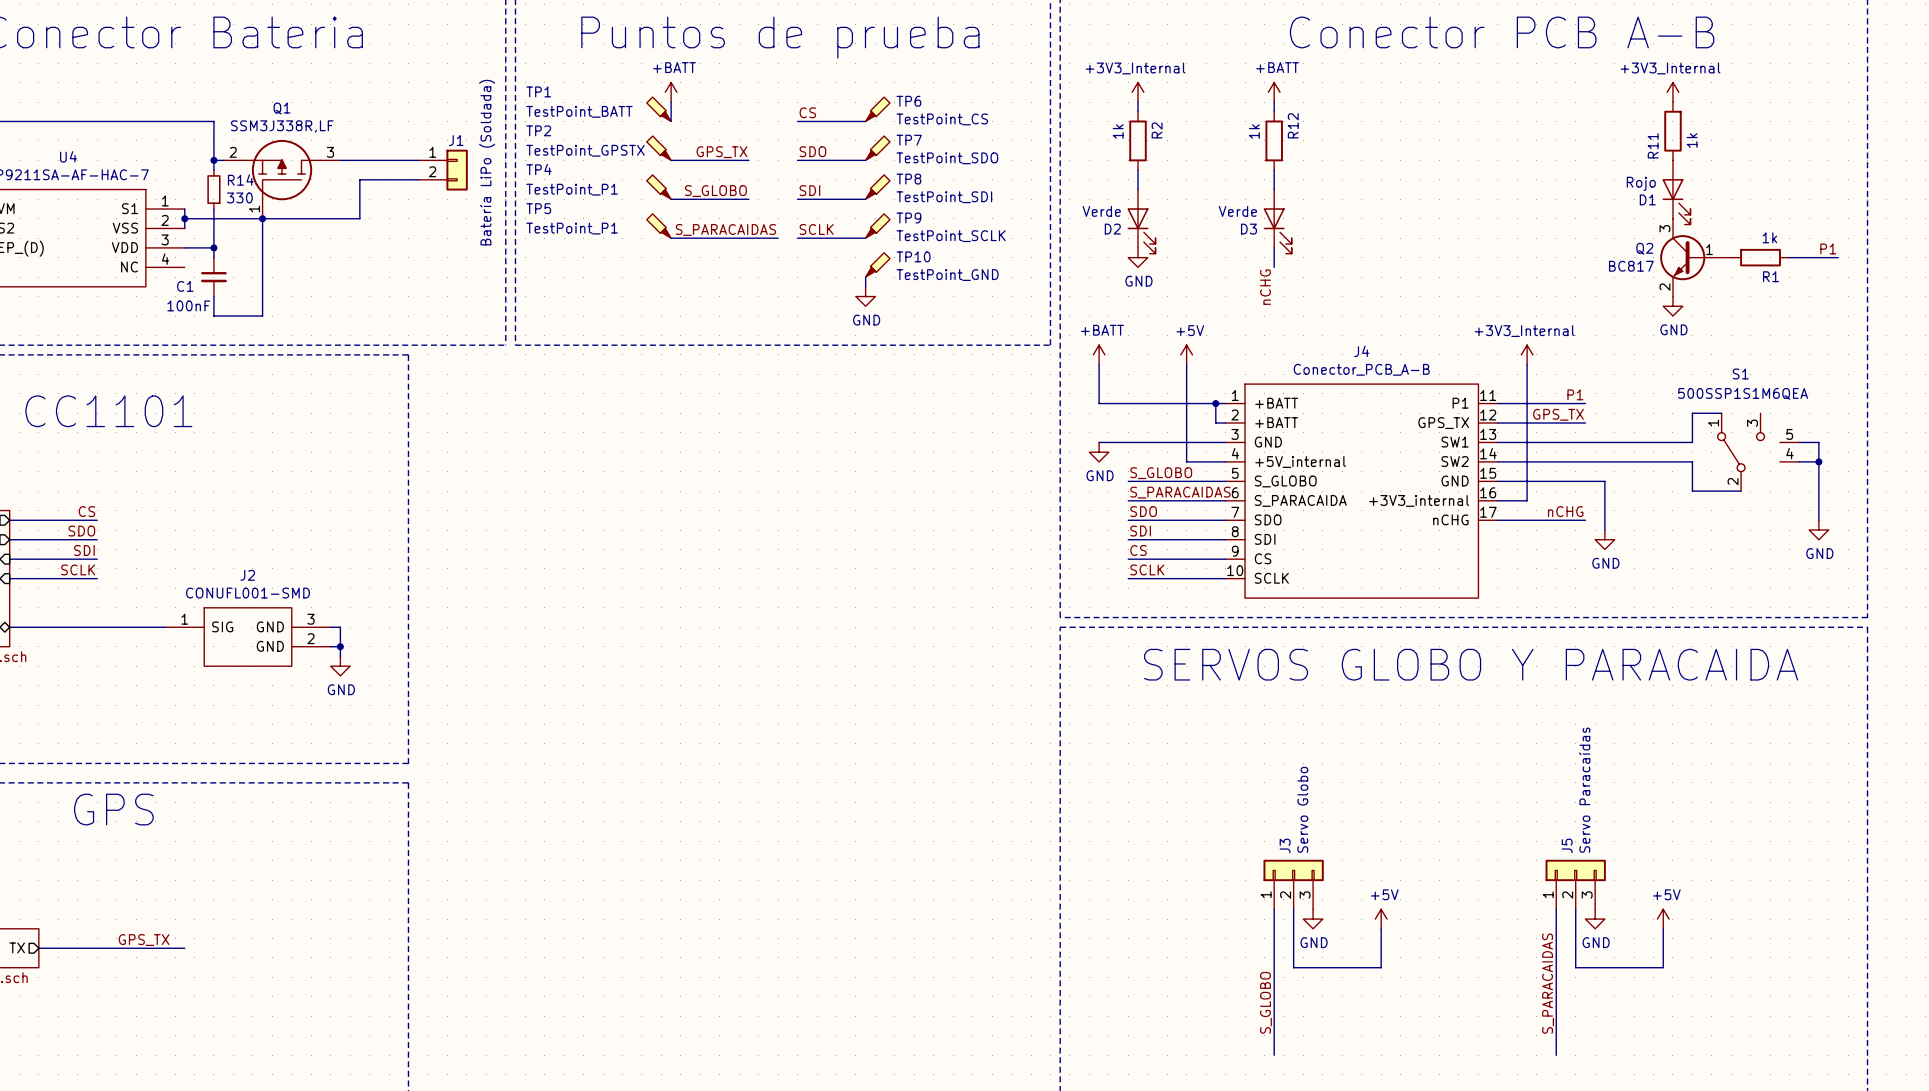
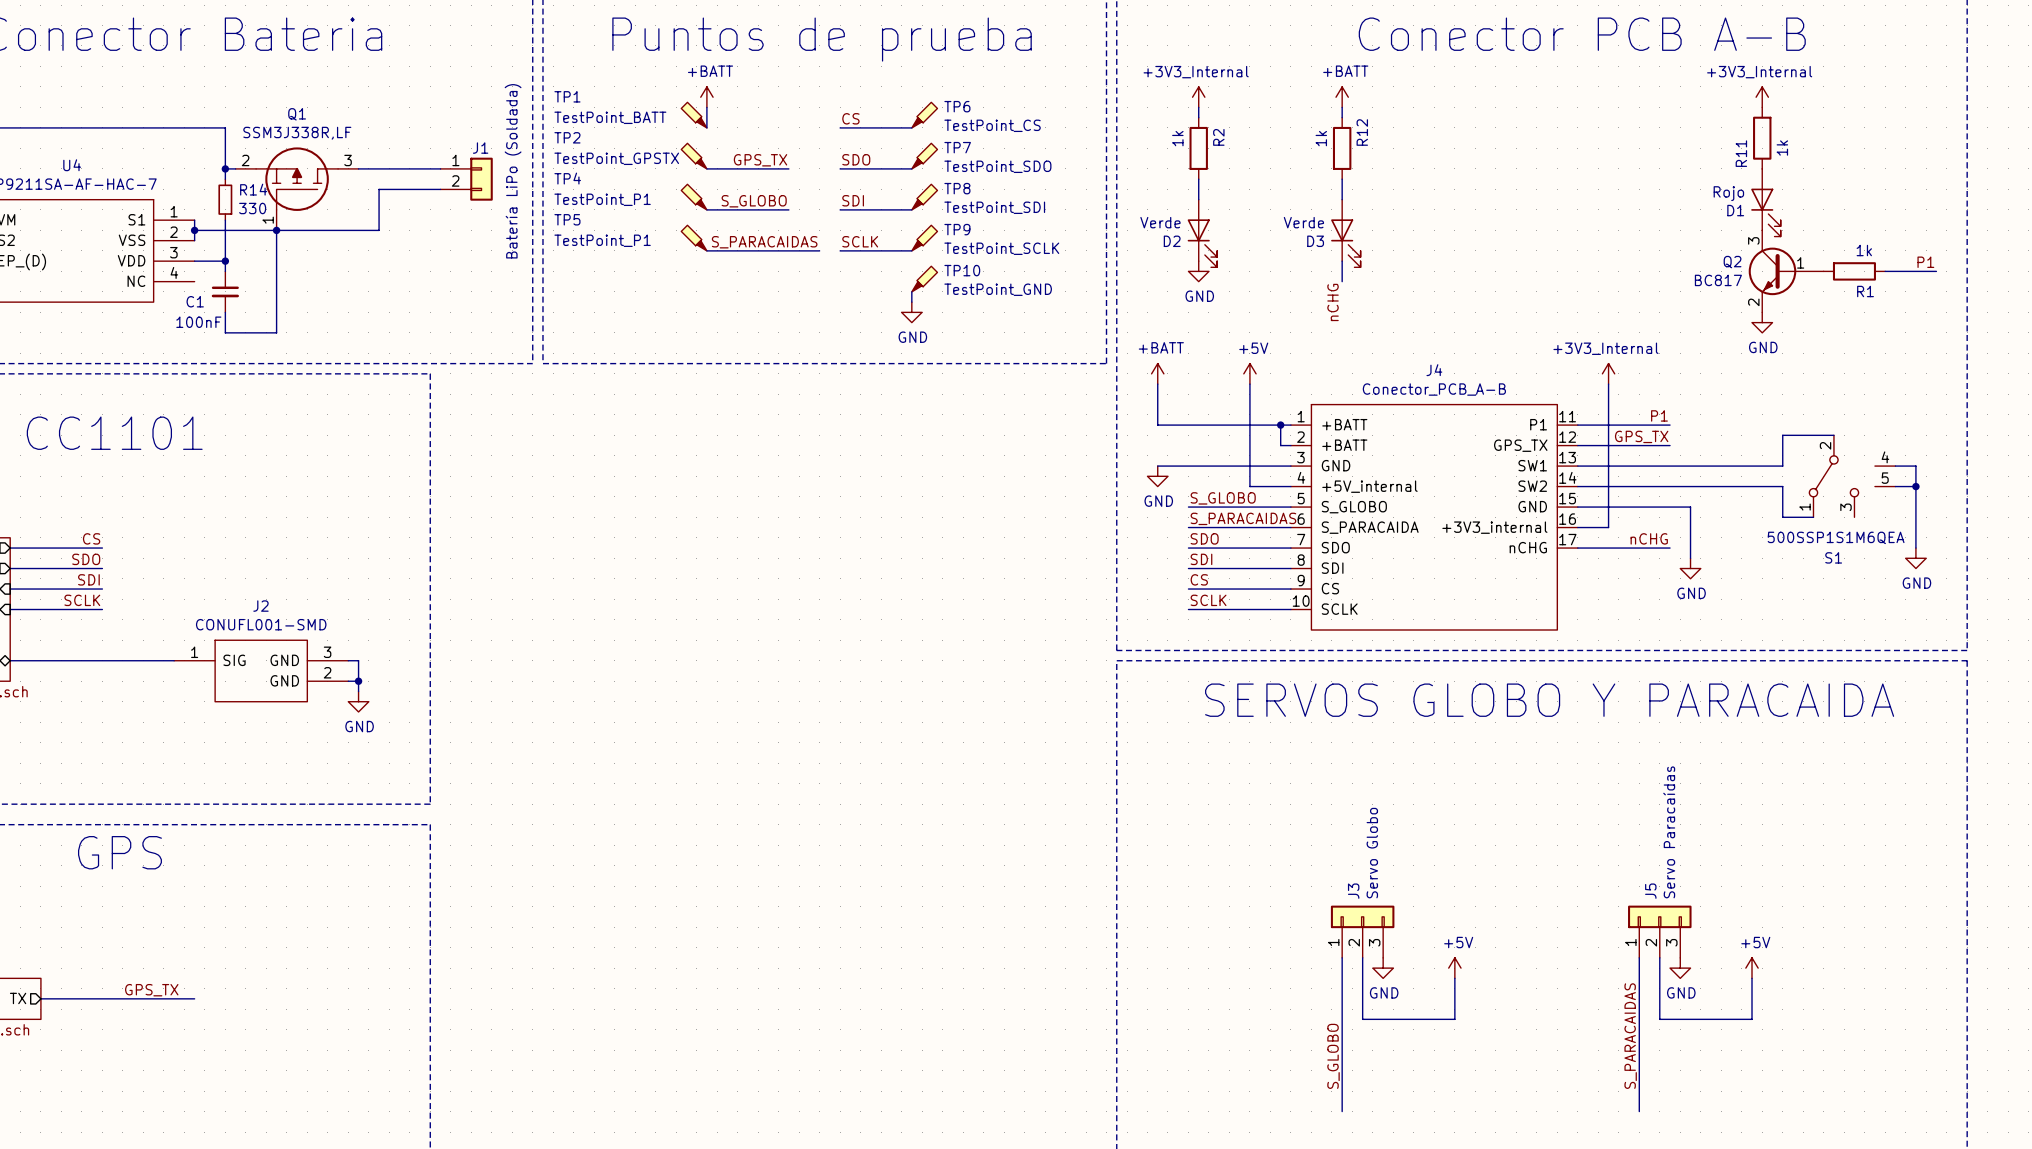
S1 flip: as is (1741, 452) -> up-down (1833, 476)
wire: (1721, 491) (1741, 491) -> (1813, 435) (1833, 435)

